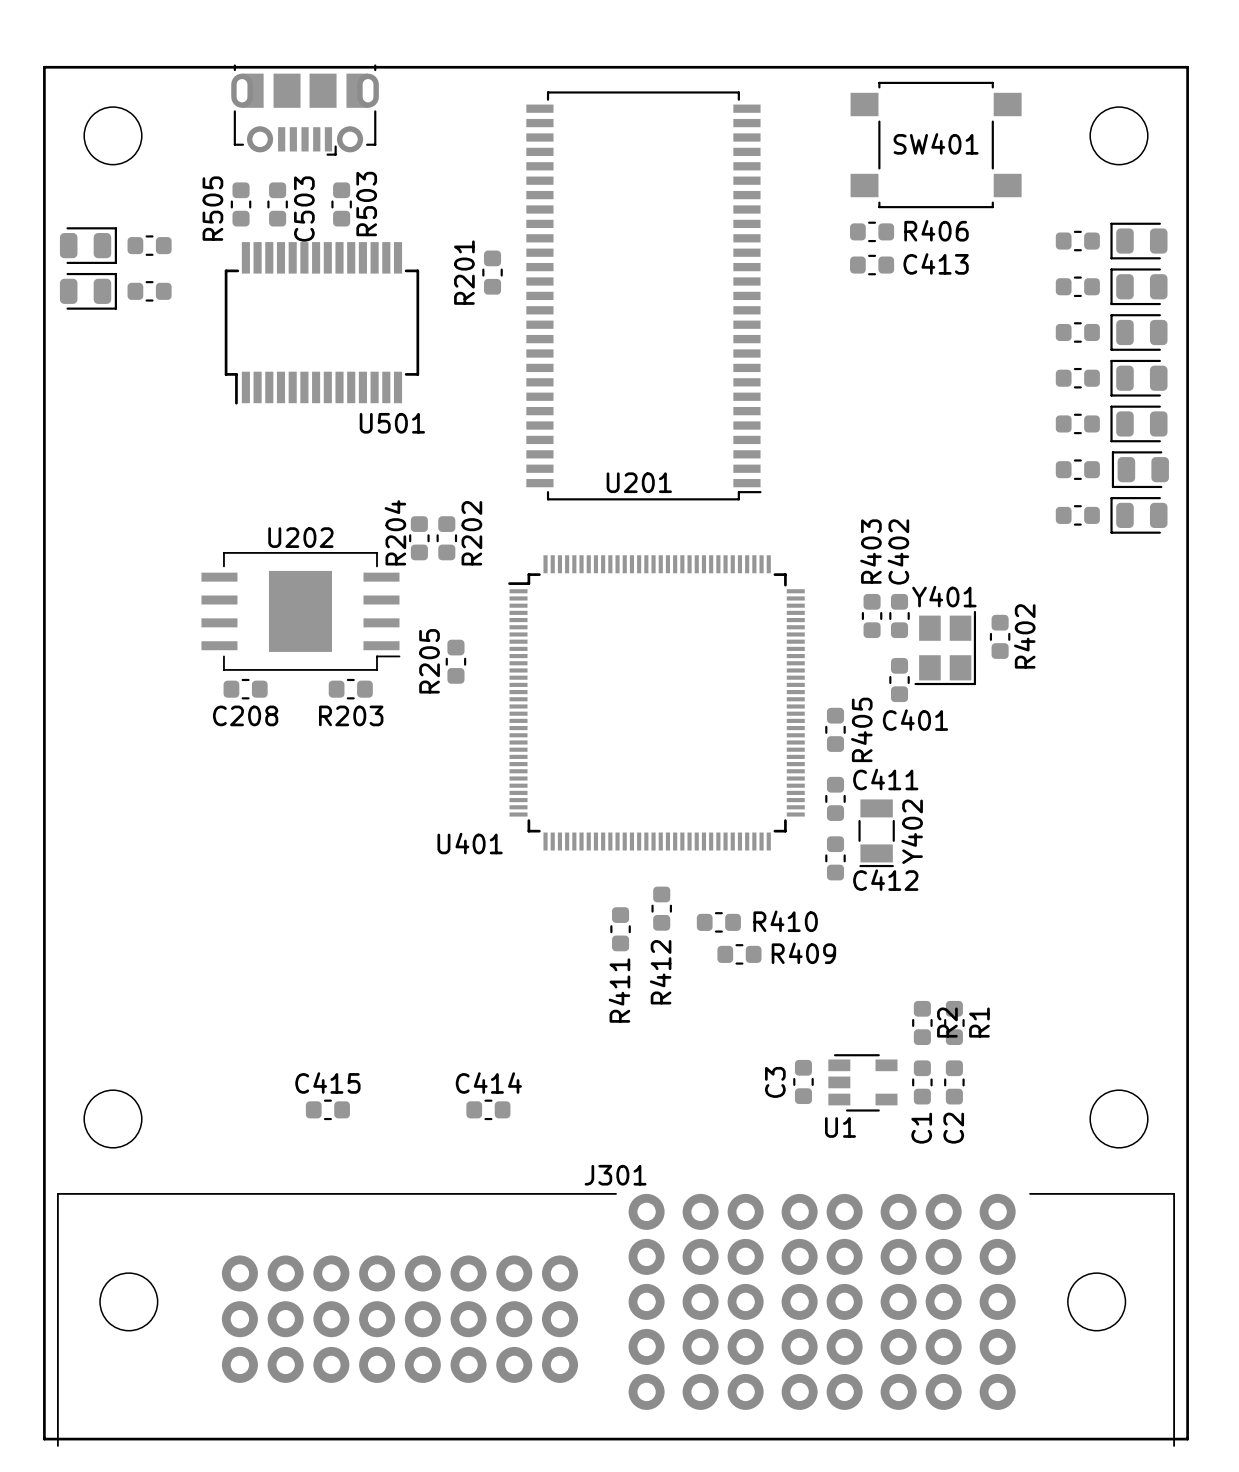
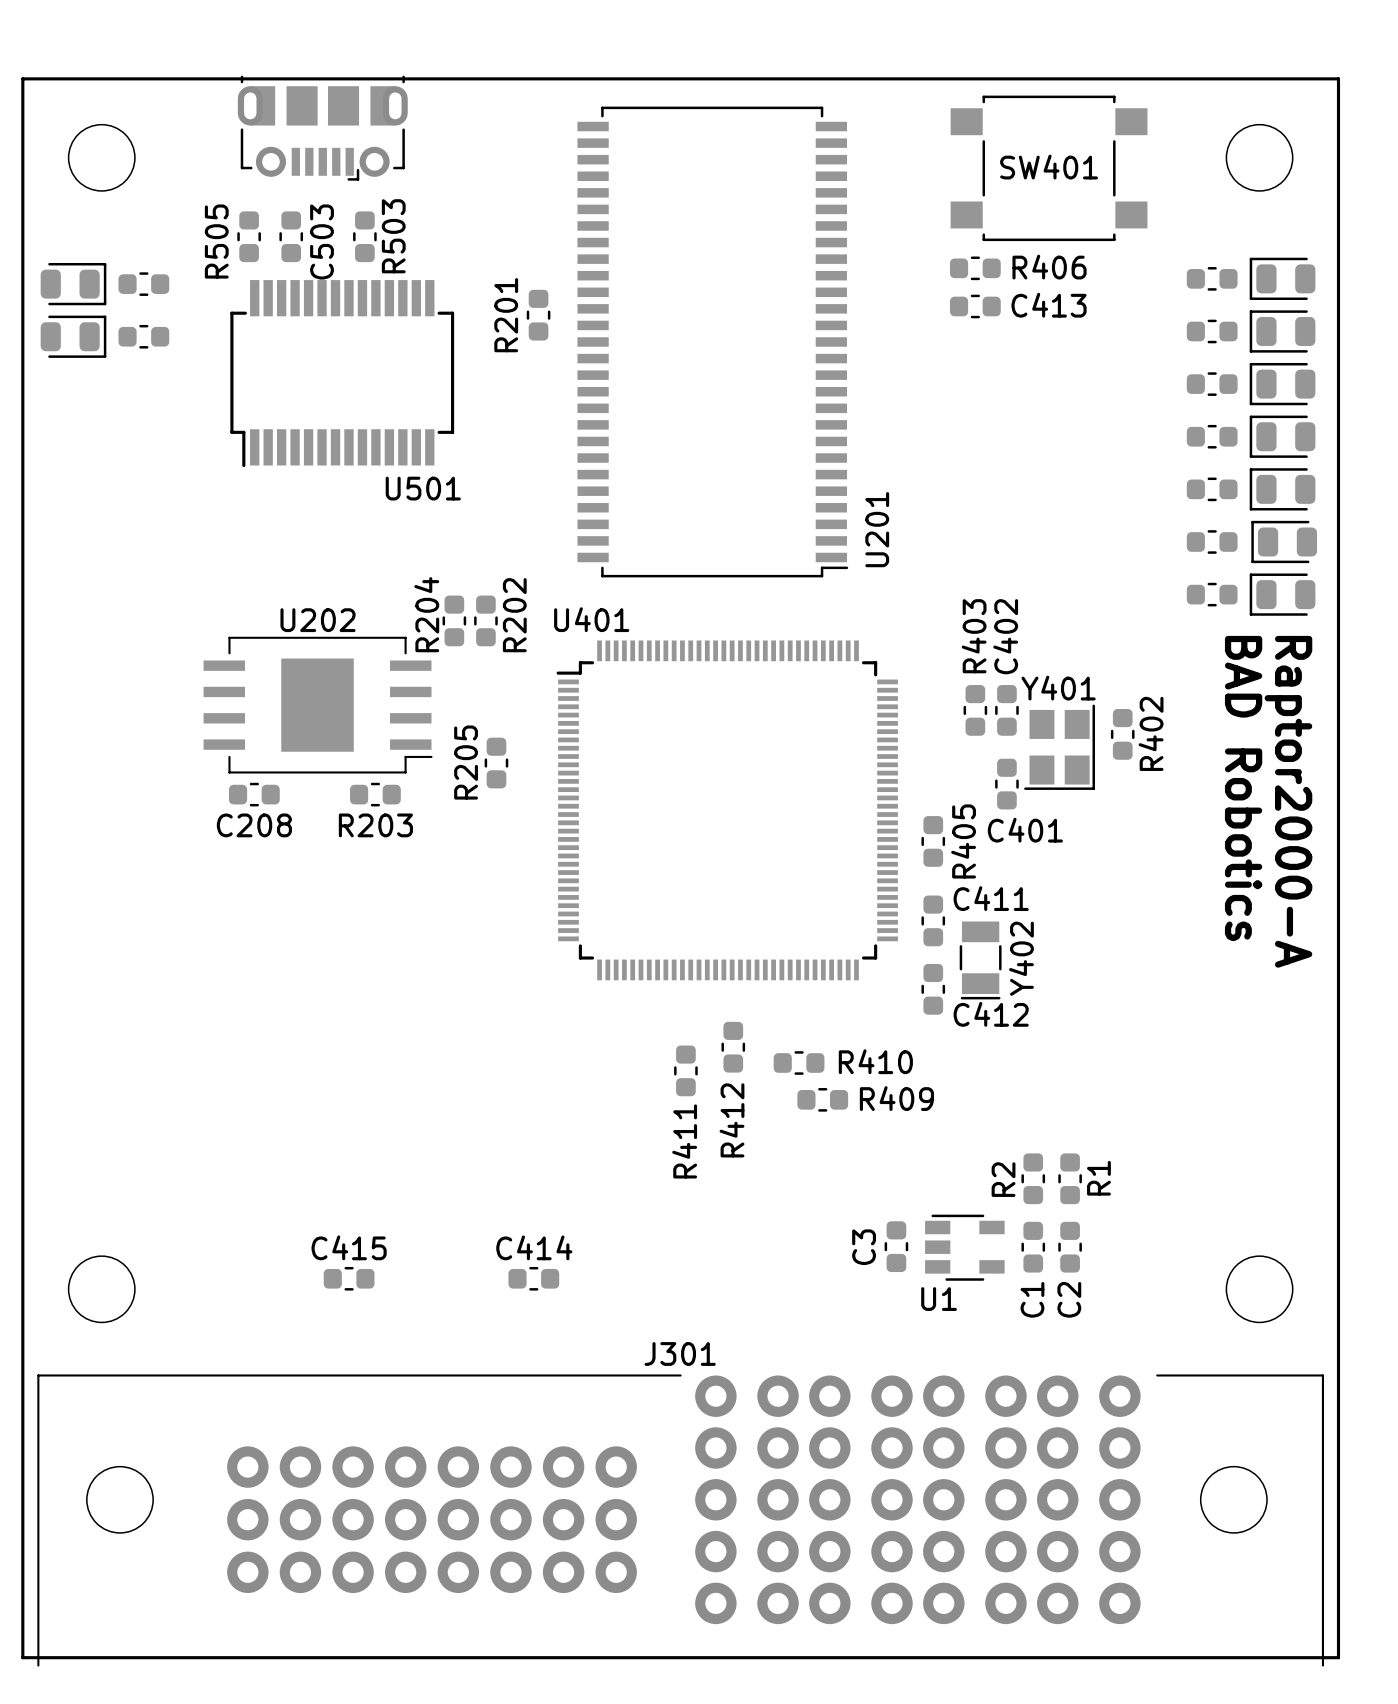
U201 name rotation: 0° (639, 482) -> 90° counterclockwise (877, 529)
U201 name position: U201 (639, 482) -> U201 (877, 529)
text: none -> BAD Robotics (1243, 788)
text: none -> Raptor2000-A (1288, 801)
U401 name position: U401 (470, 843) -> U401 (591, 619)
R2 name position: R2 (947, 1022) -> R2 (1003, 1179)

